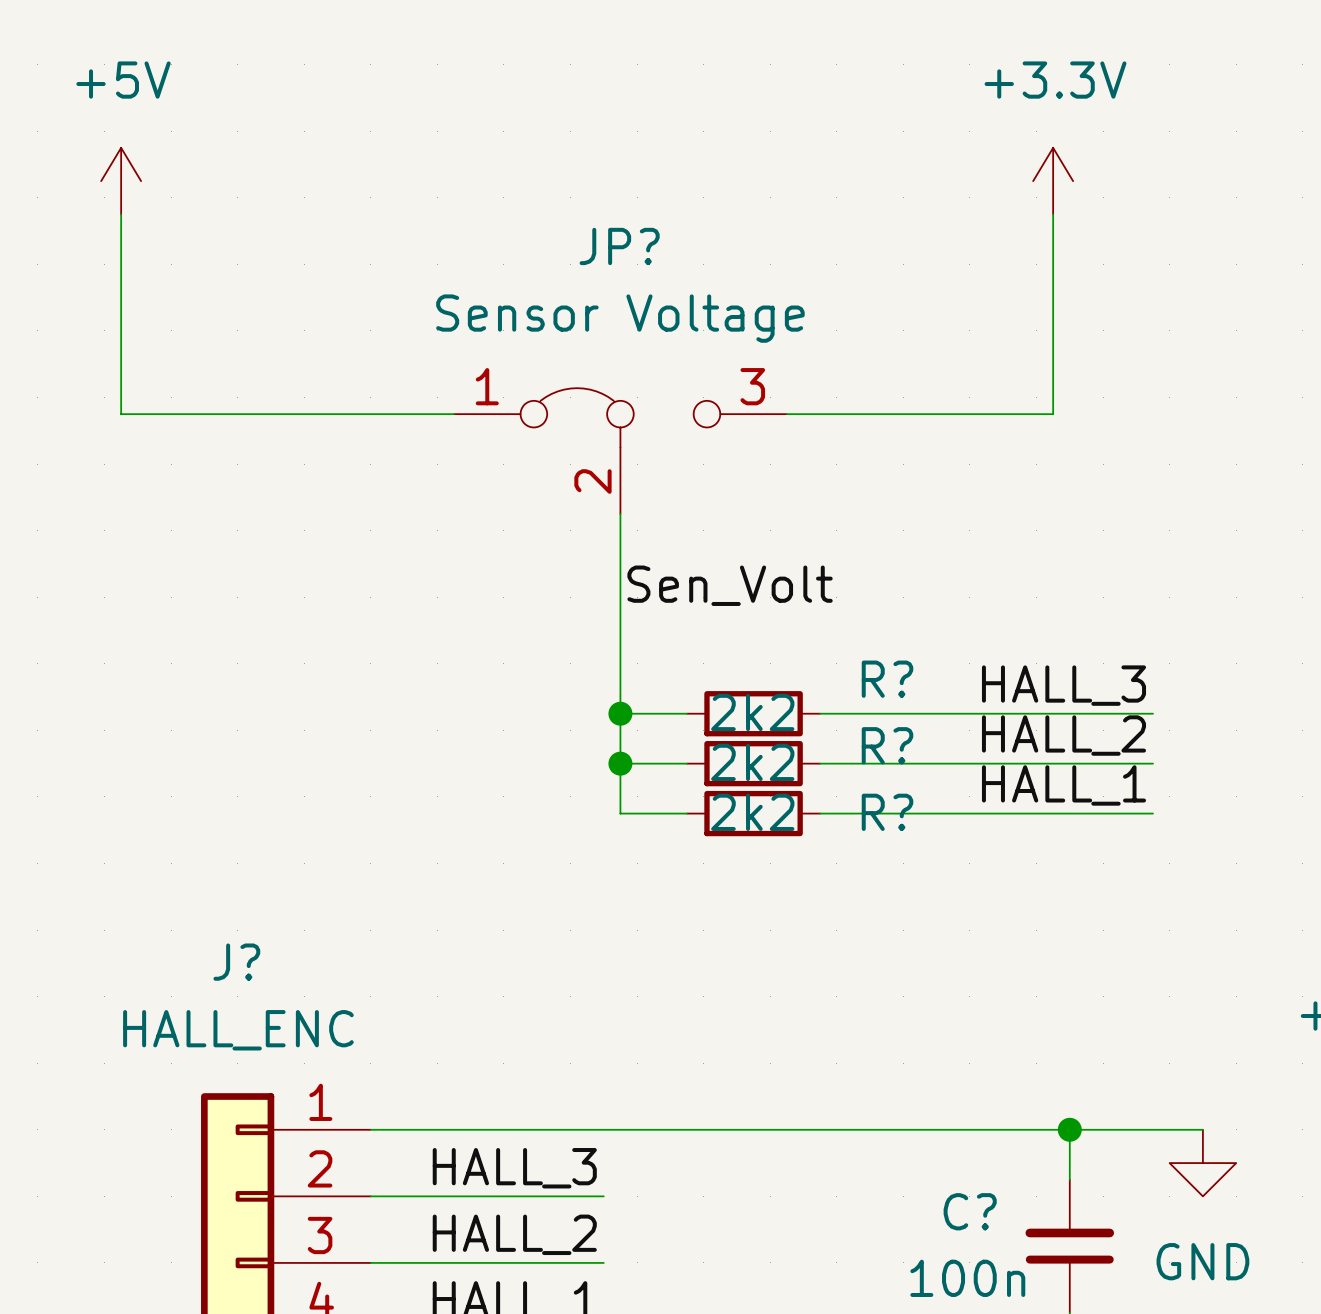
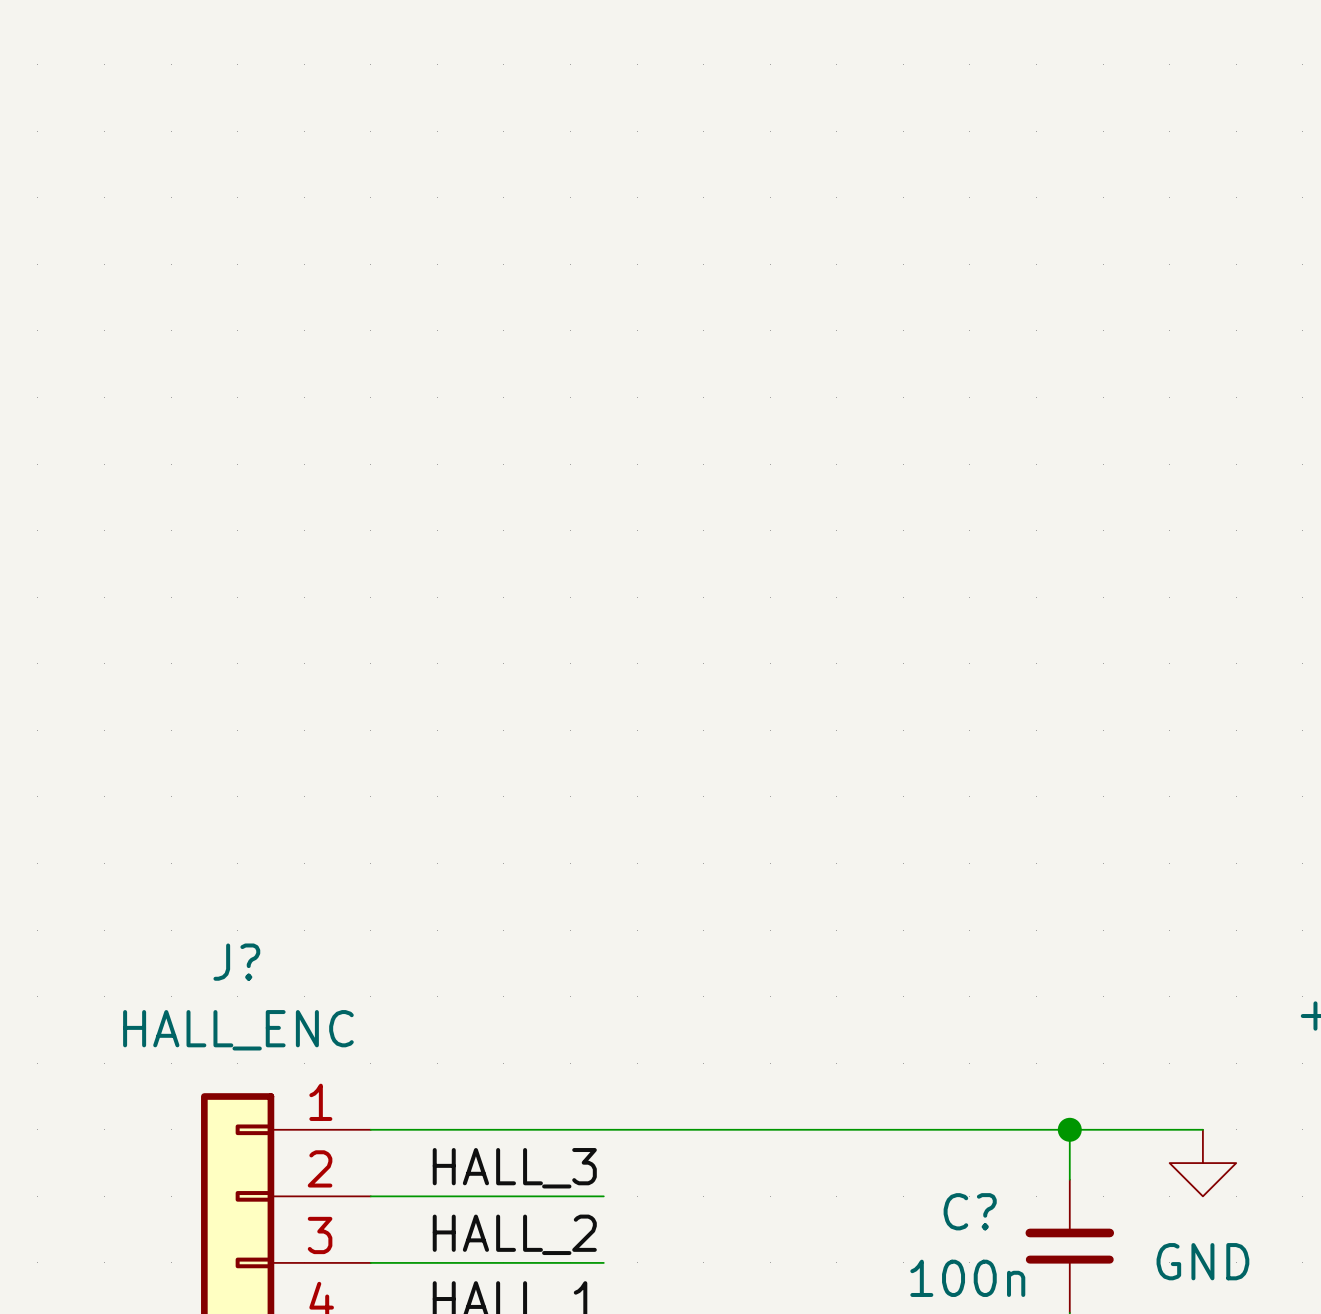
power symbol: +5V (121, 181) -> none
power symbol: +3.3V (1053, 181) -> none
wire: (121, 214) (121, 414) (454, 414) -> none
wire: (1053, 214) (1053, 414) (786, 414) -> none
JP?: Sensor Voltage (620, 451) -> none
wire: (620, 514) (620, 813) (687, 813) -> none
label: Sen_Volt (730, 585) -> none
label: HALL_3 (1063, 685) -> none
wire: (620, 713) (687, 713) -> none
junction: (620, 713) -> none
R?: 2k2 (753, 713) -> none
wire: (820, 713) (1153, 713) -> none
label: HALL_2 (1063, 735) -> none
wire: (620, 763) (687, 763) -> none
junction: (620, 763) -> none
R?: 2k2 (753, 763) -> none
wire: (820, 763) (1153, 763) -> none
label: HALL_1 (1063, 785) -> none
R?: 2k2 (753, 813) -> none
wire: (820, 813) (1153, 813) -> none

